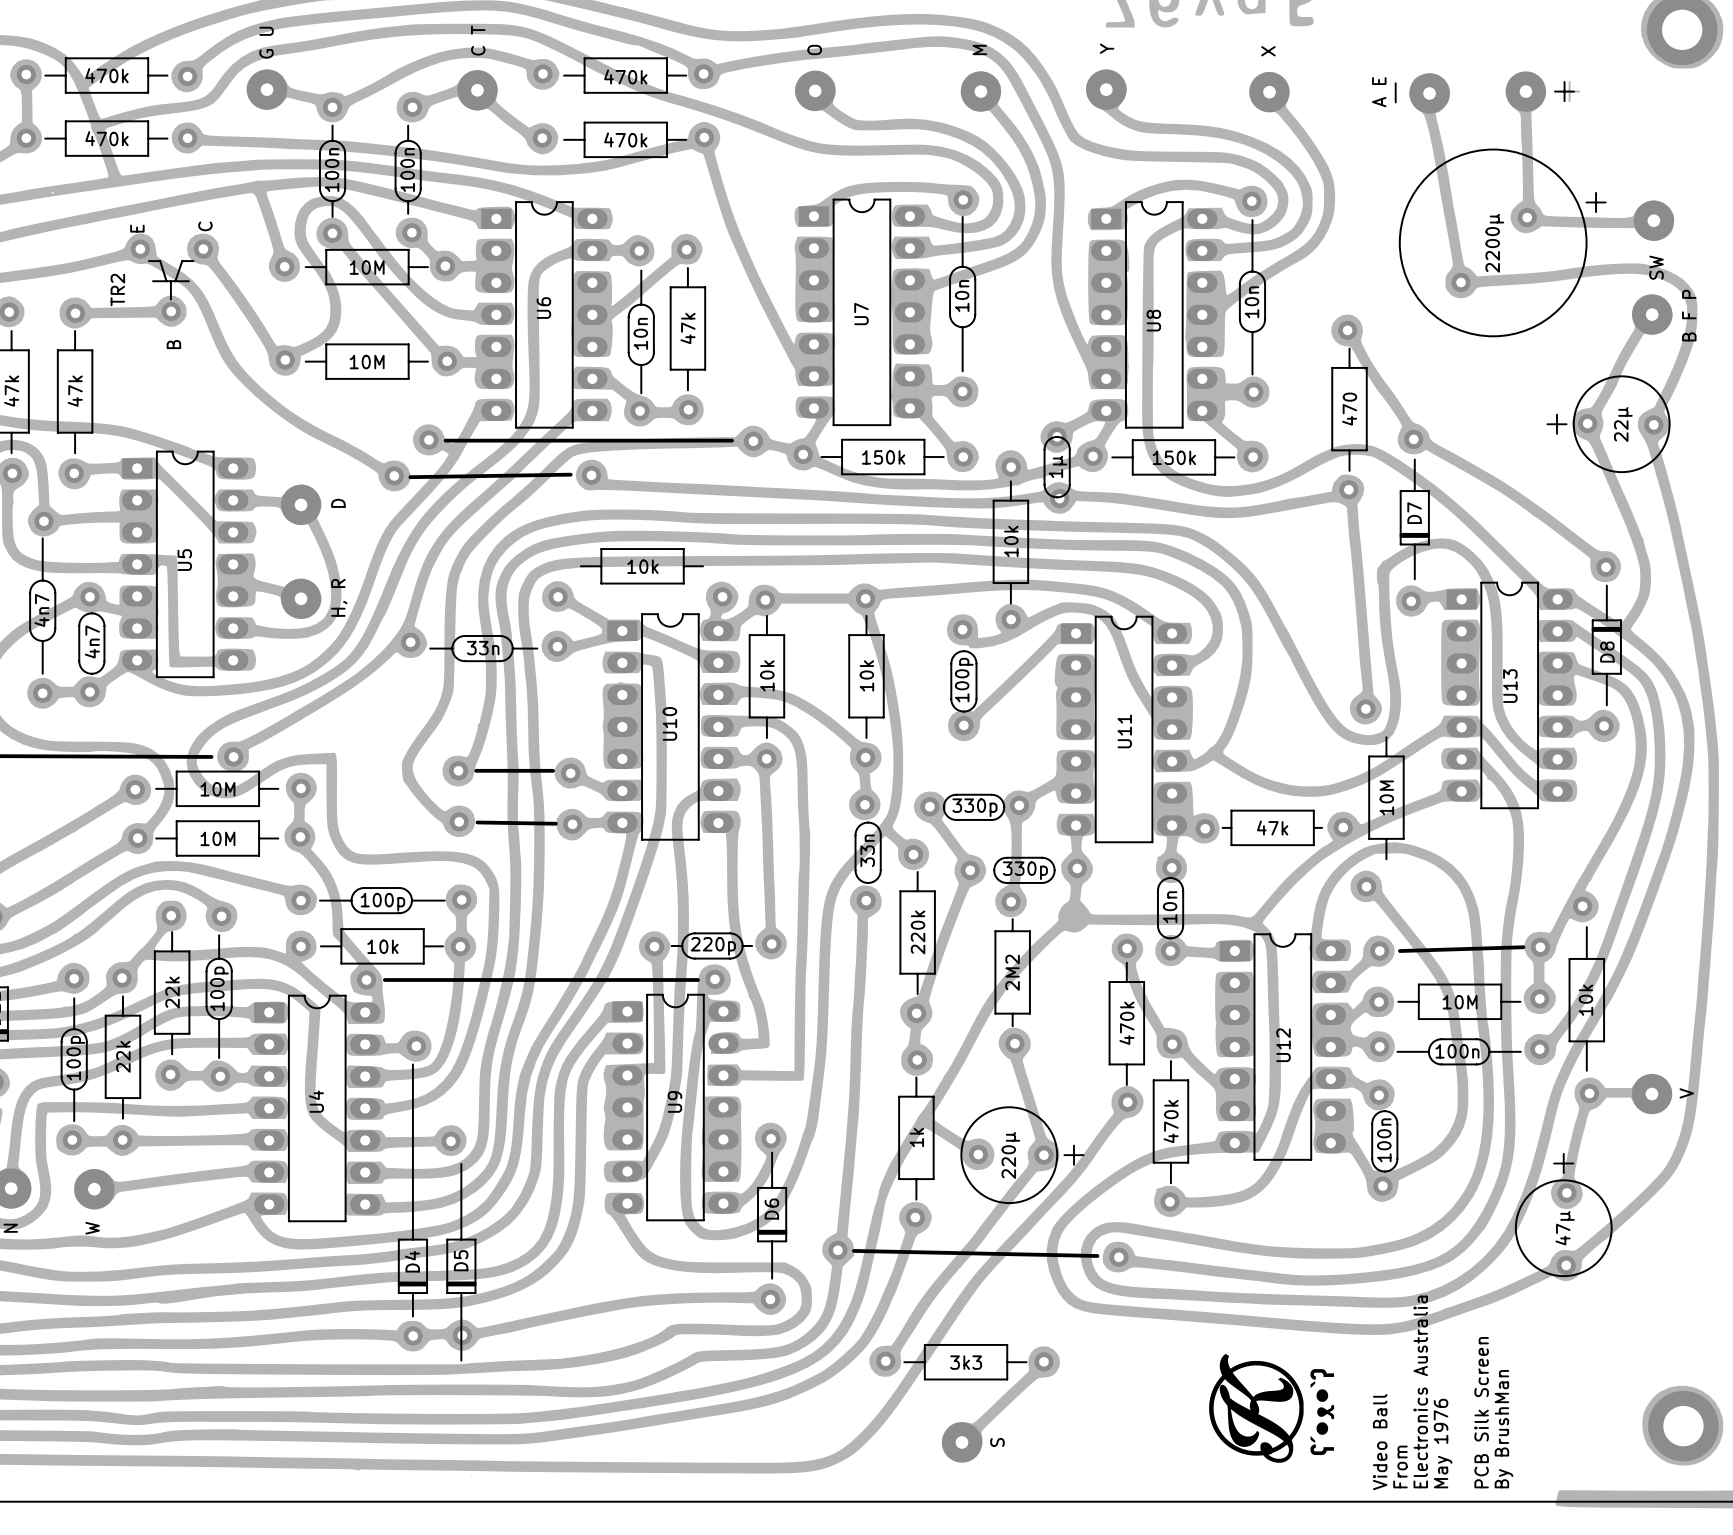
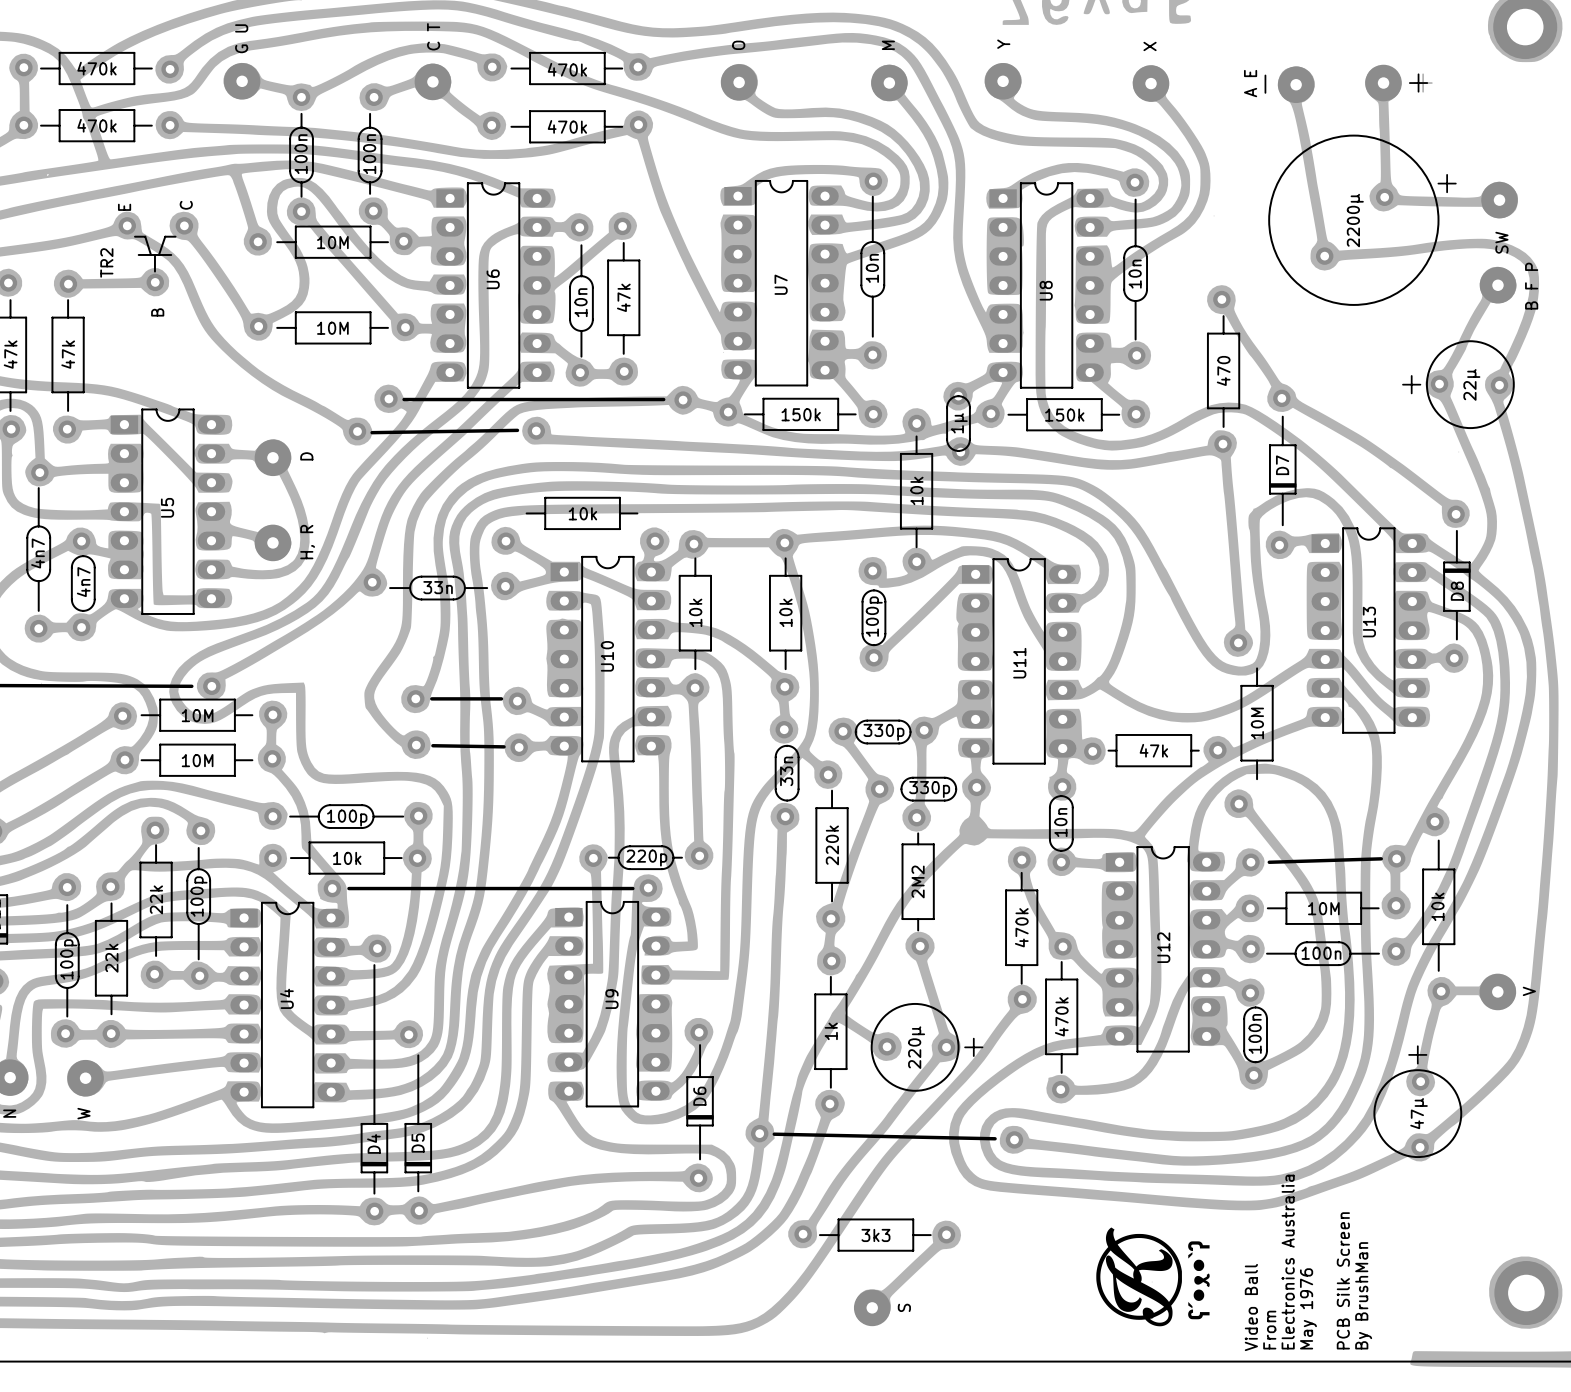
line: (461, 1313) (461, 1360) -> none

